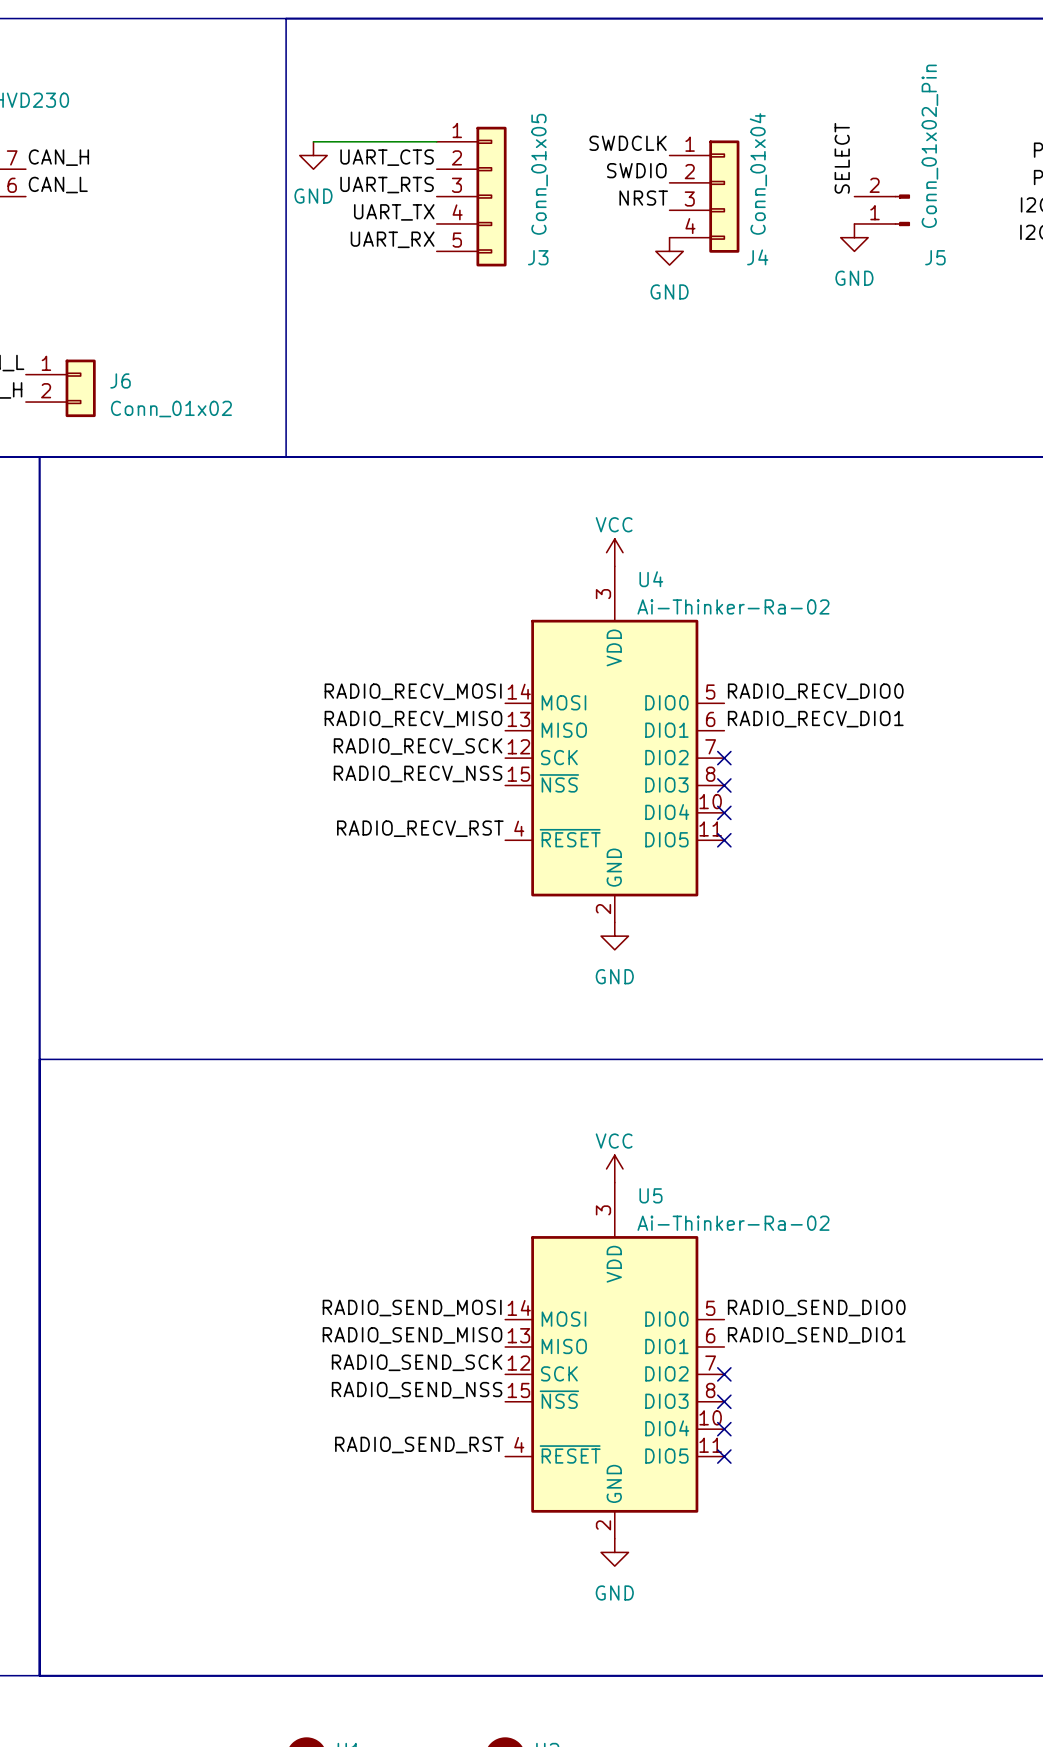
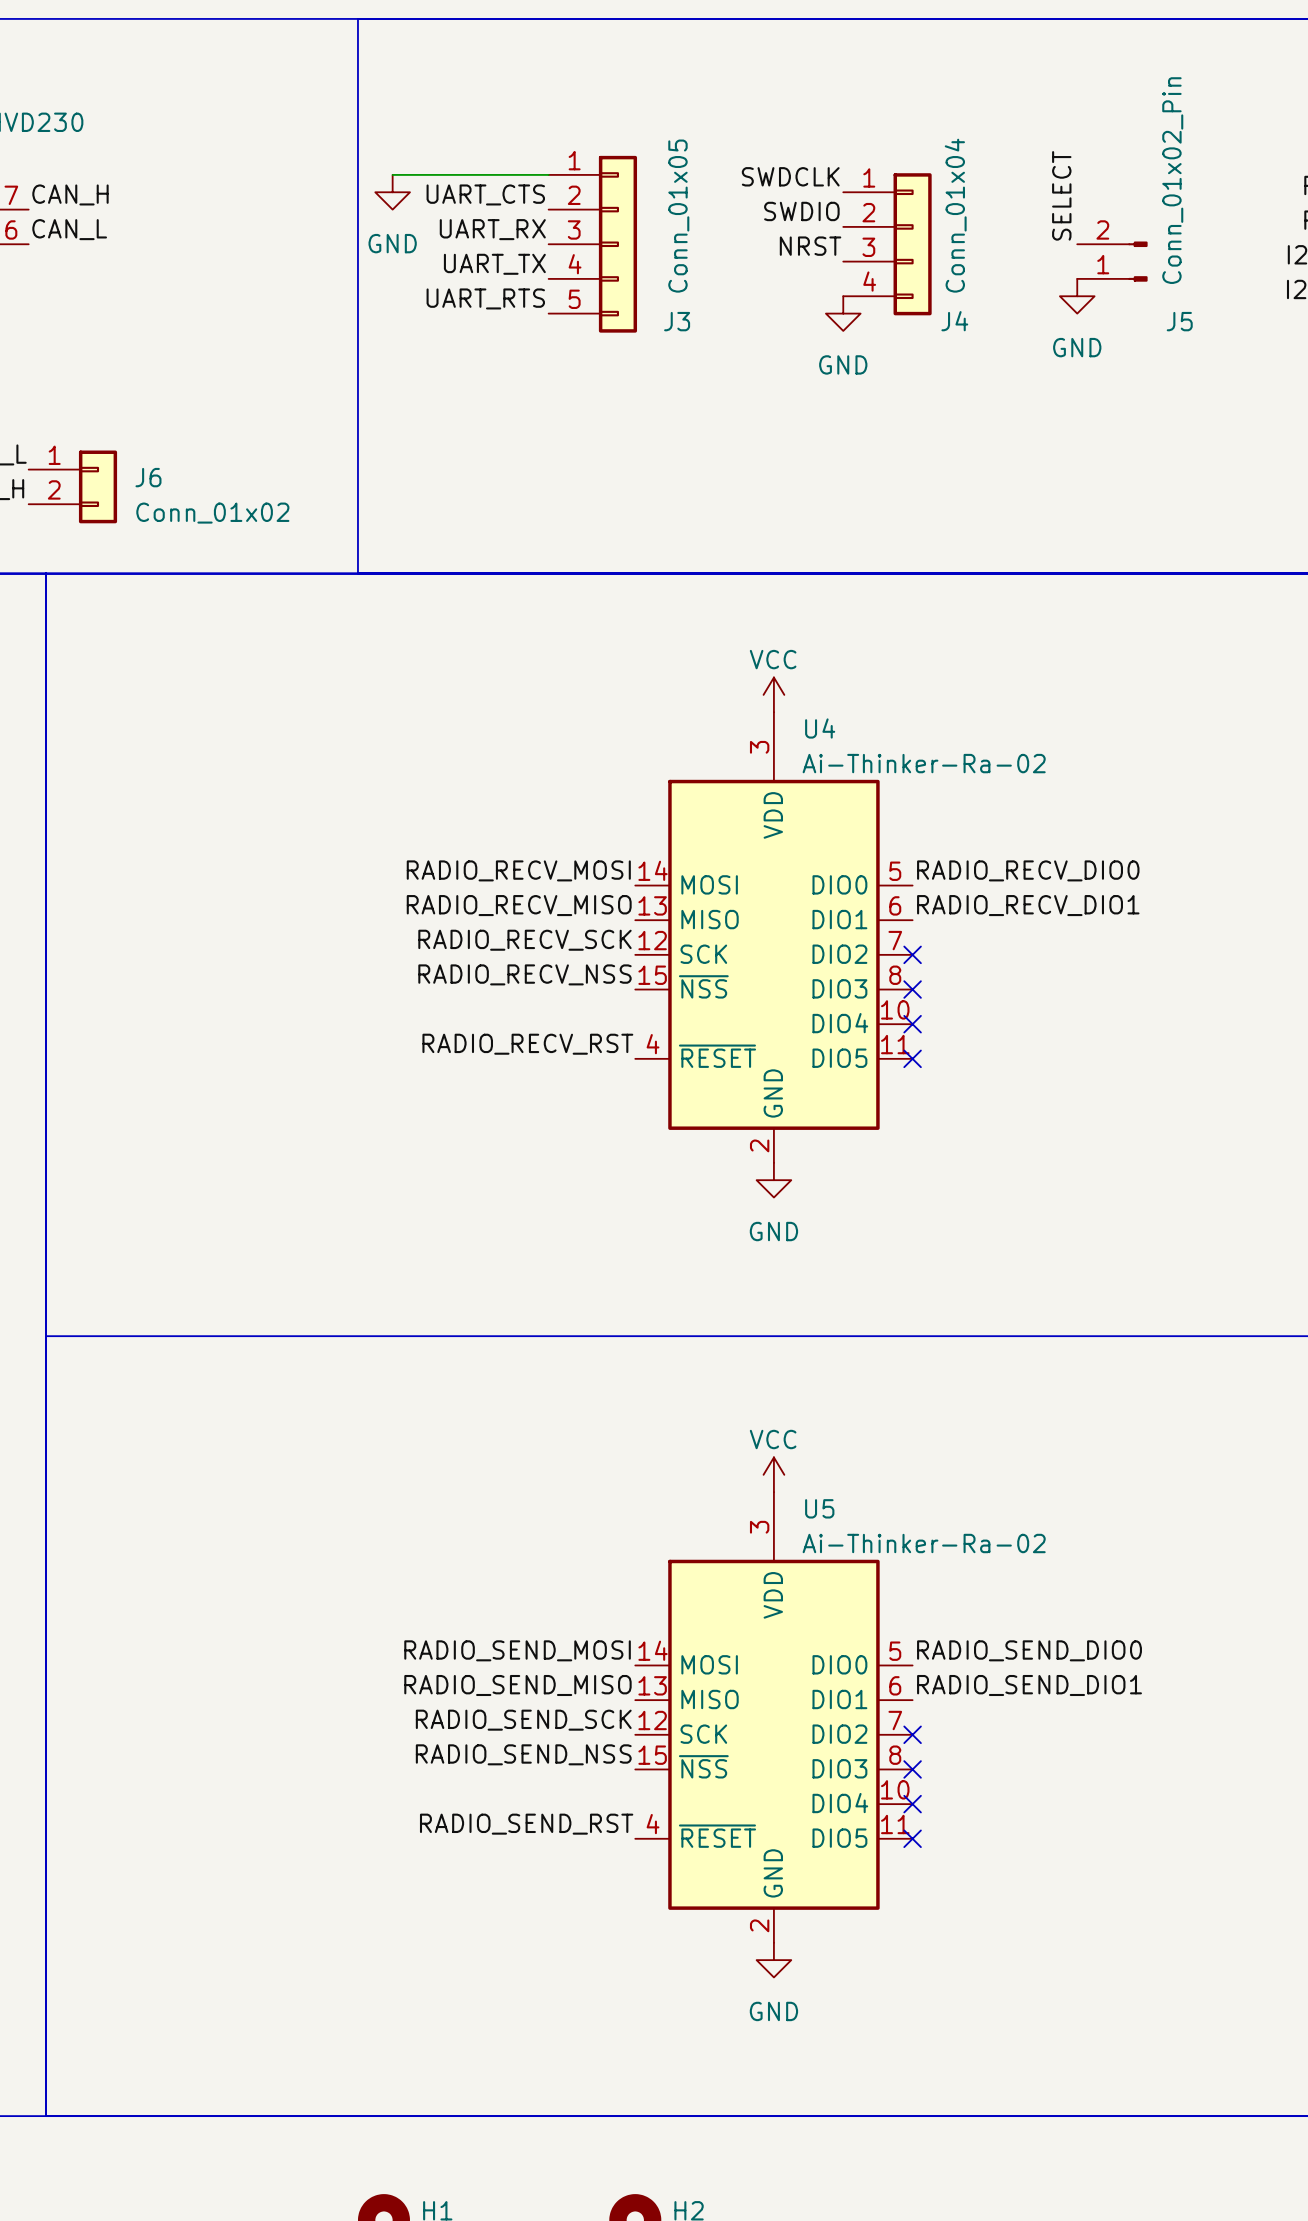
label: UART_RTS (387, 185) -> UART_RX (492, 229)
label: UART_RX (392, 239) -> UART_RTS (485, 298)

